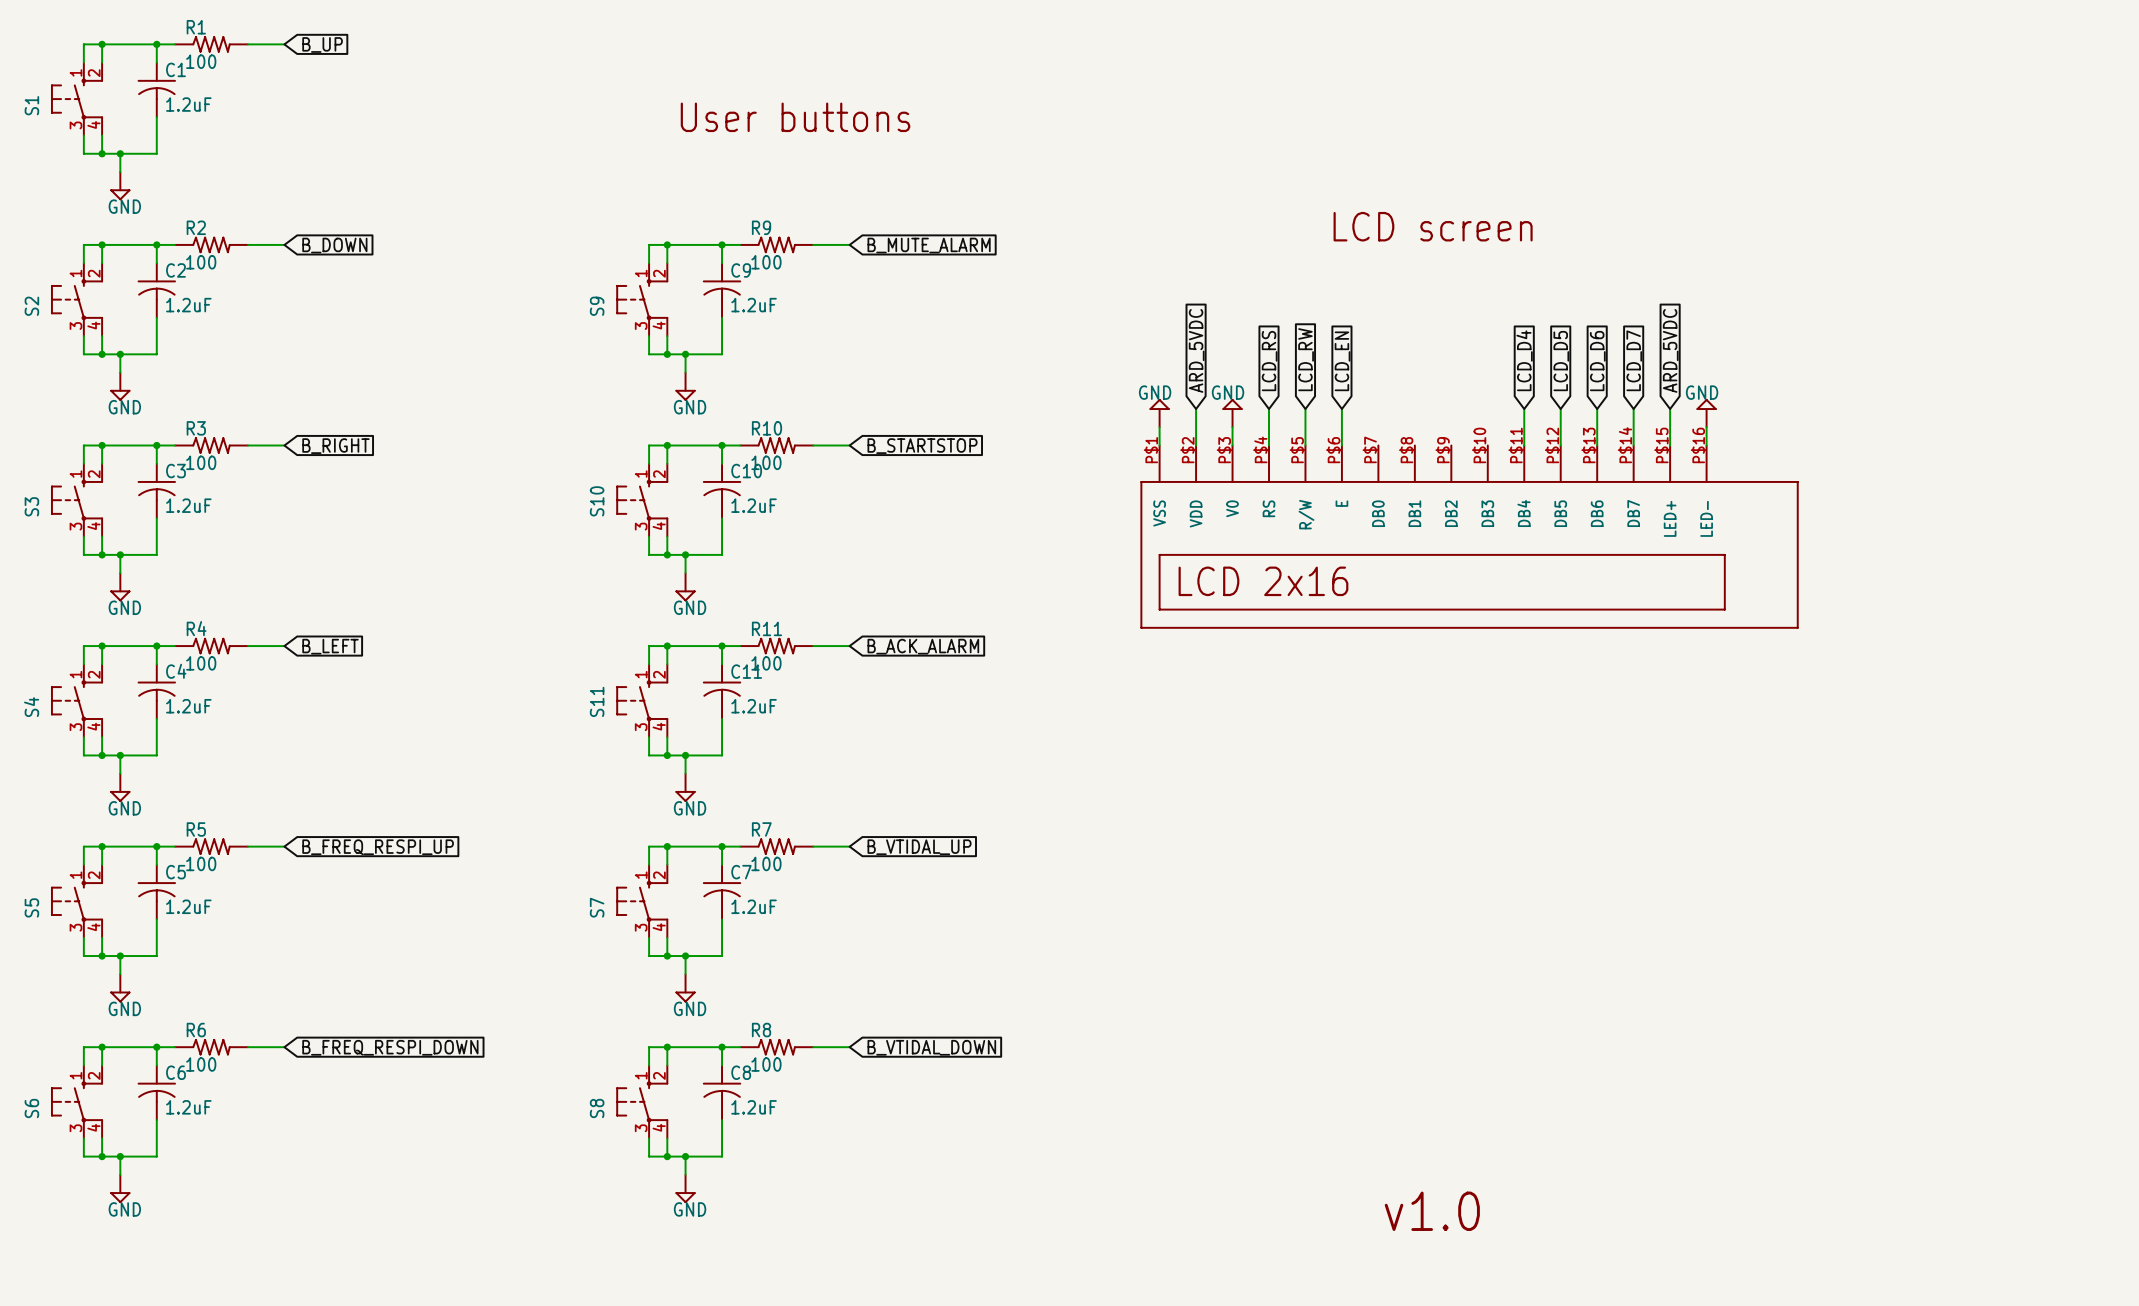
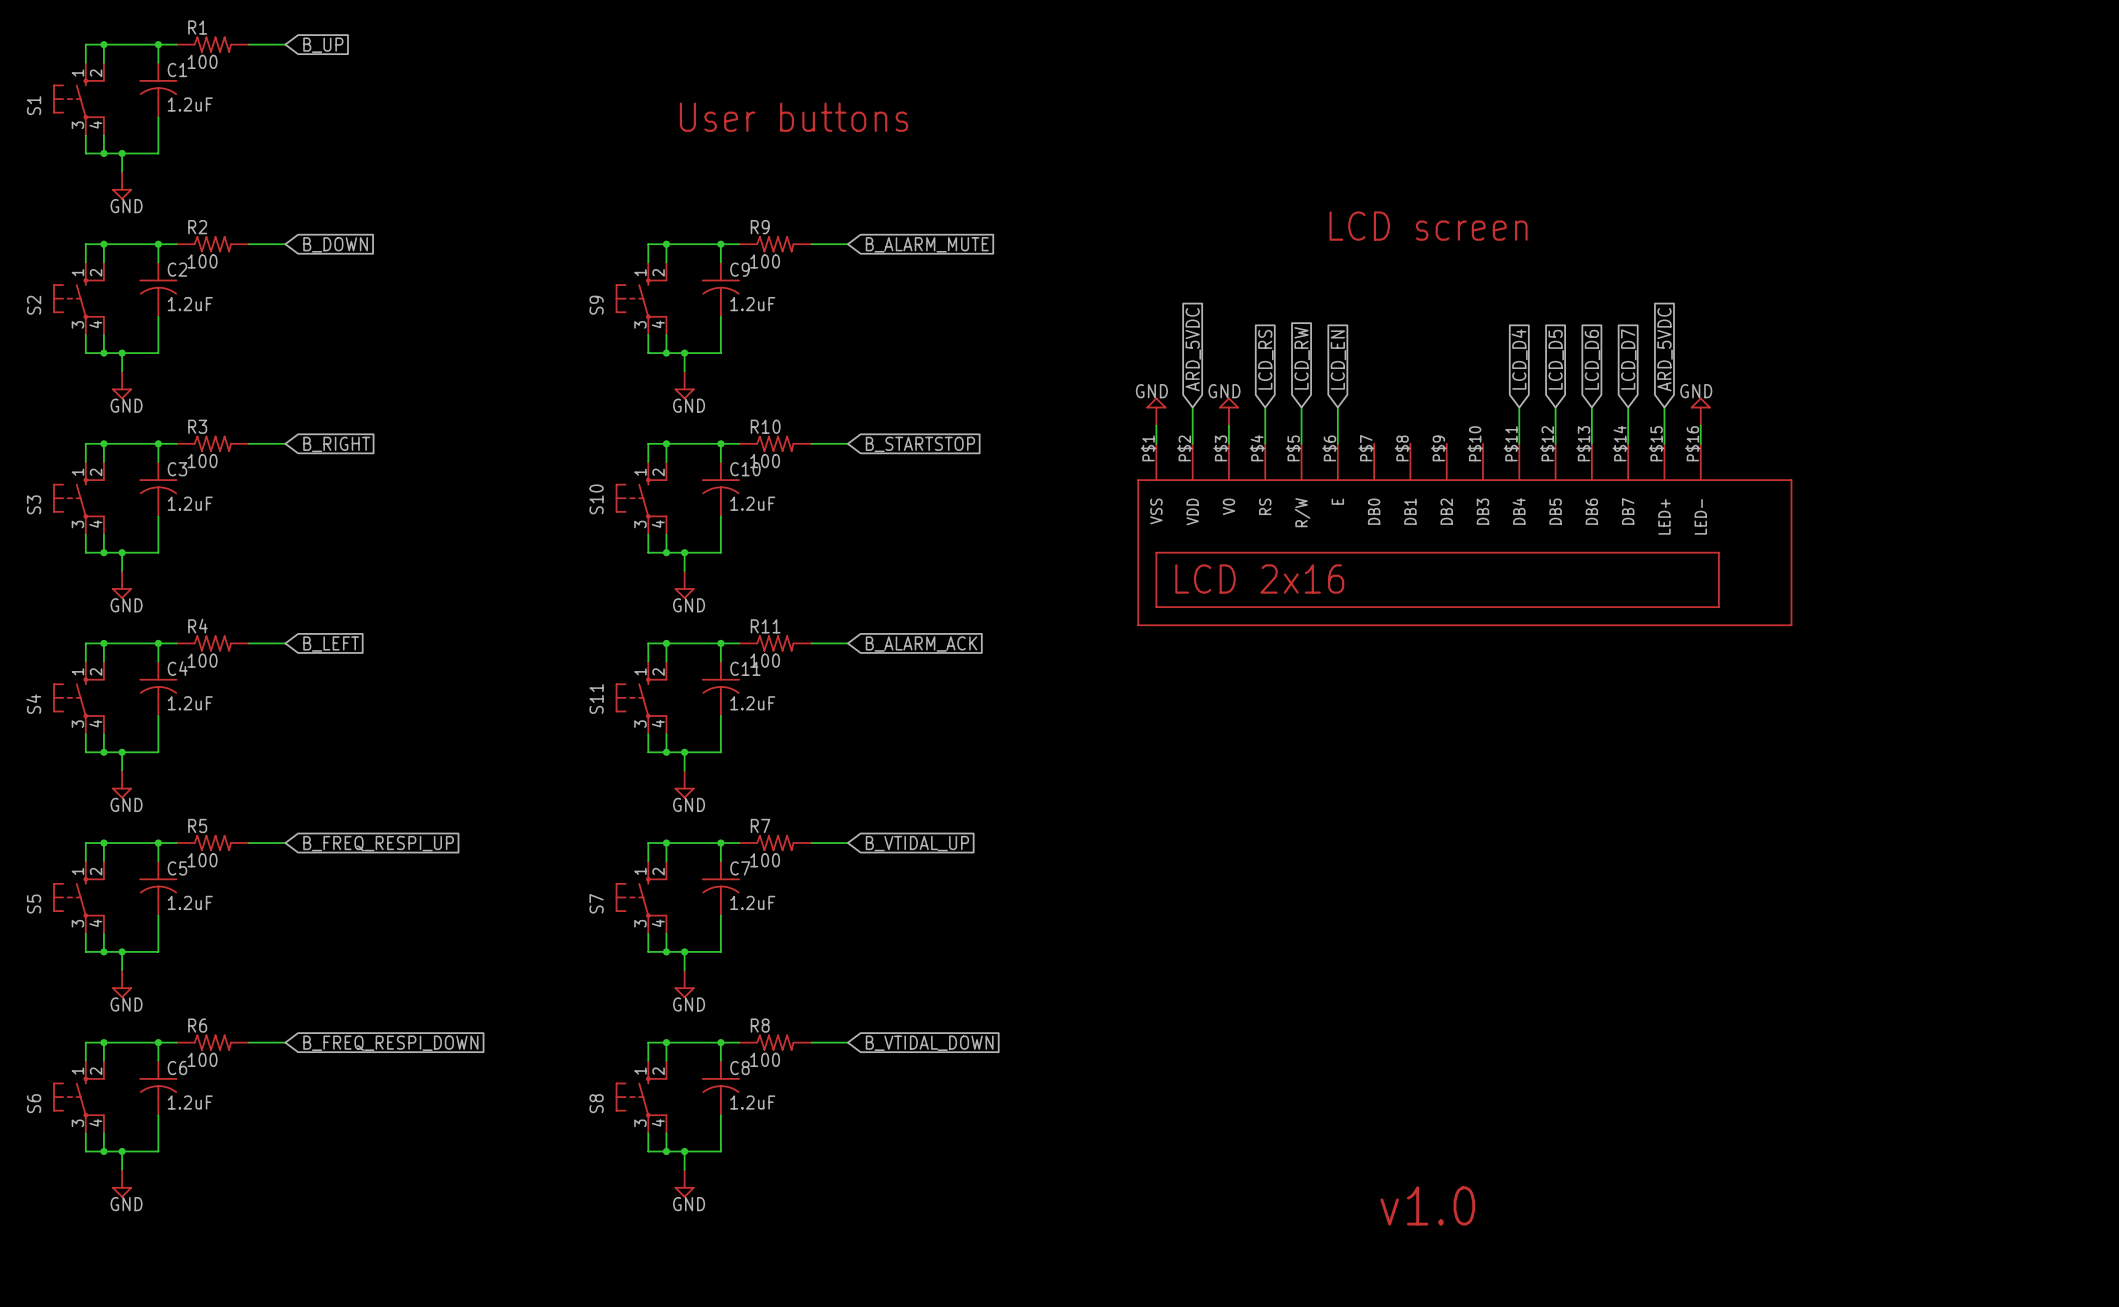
global label: B_MUTE_ALARM (929, 245) -> B_ALARM_MUTE (927, 244)
global label: B_ACK_ALARM (923, 646) -> B_ALARM_ACK (921, 644)

